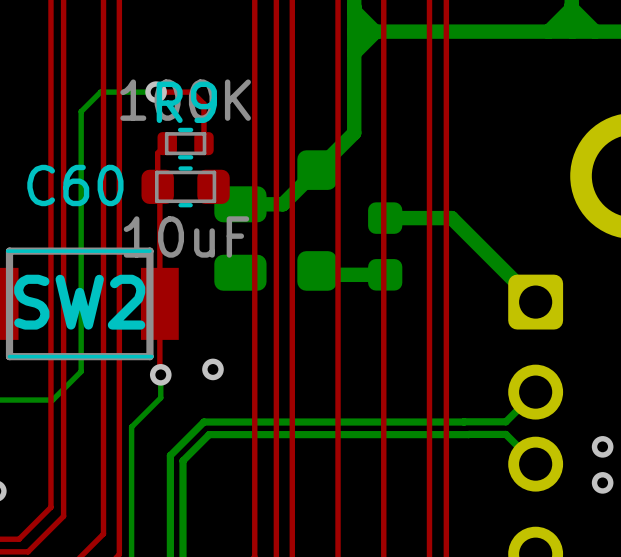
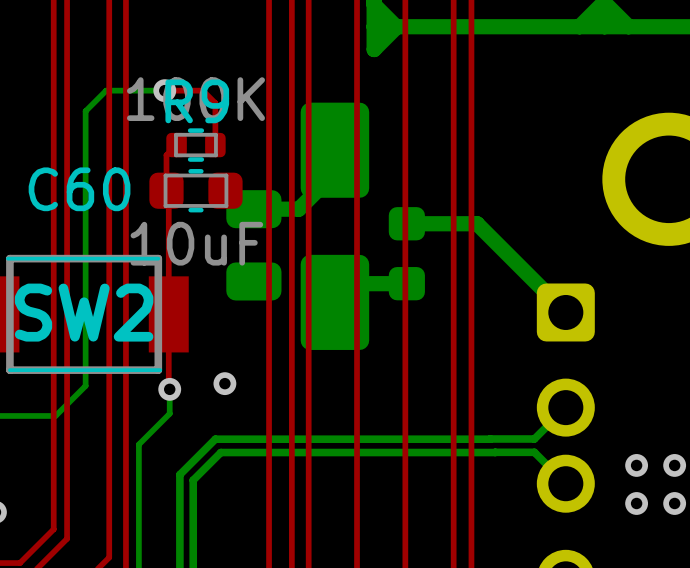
bottom track: (354, 53) (354, 133) (317, 170) -> none
part footprint: [297, 150, 337, 291] -> [300, 102, 370, 350]

